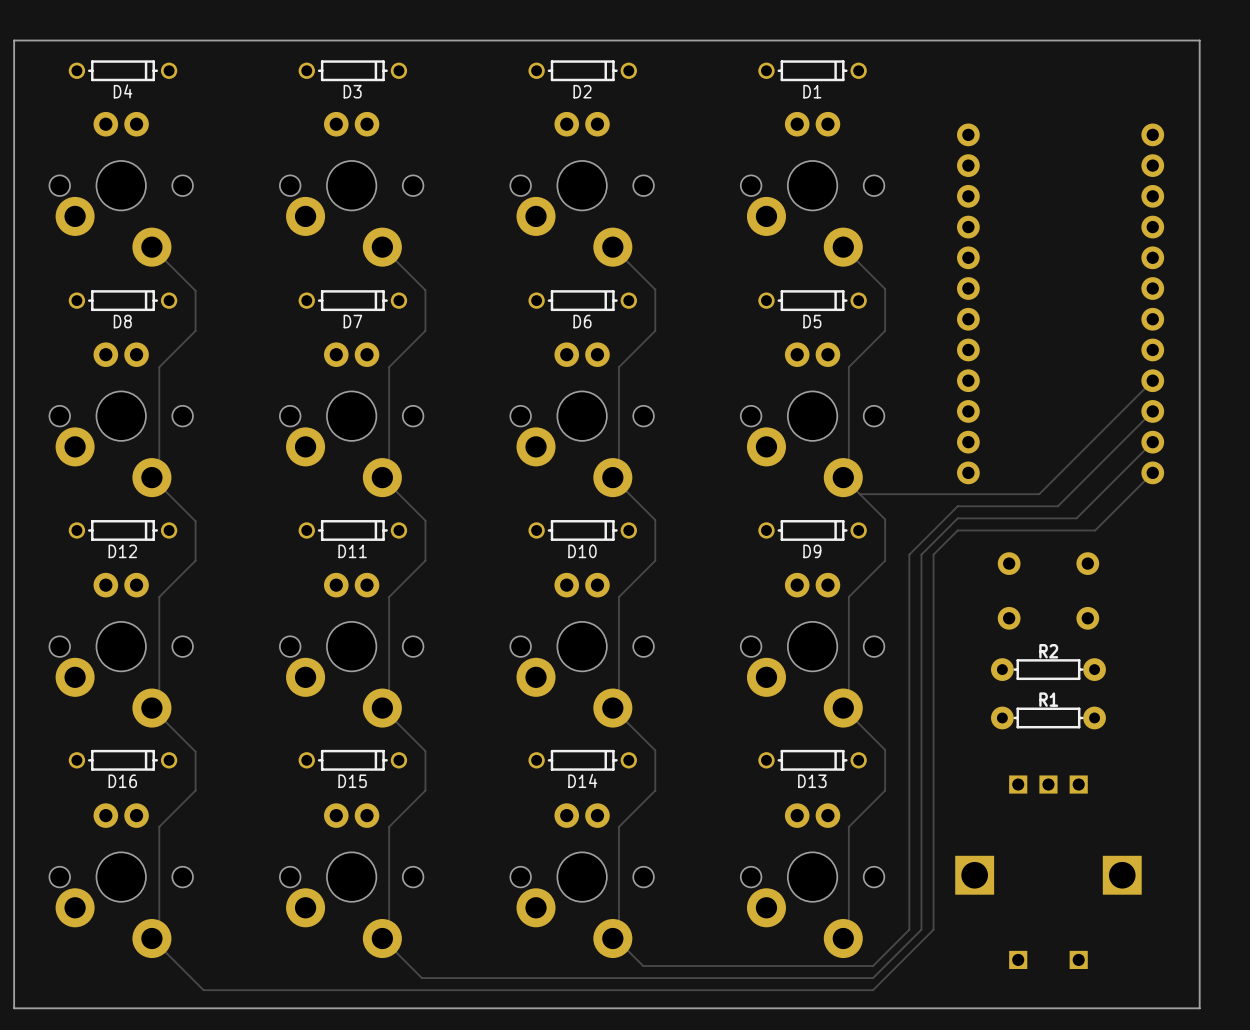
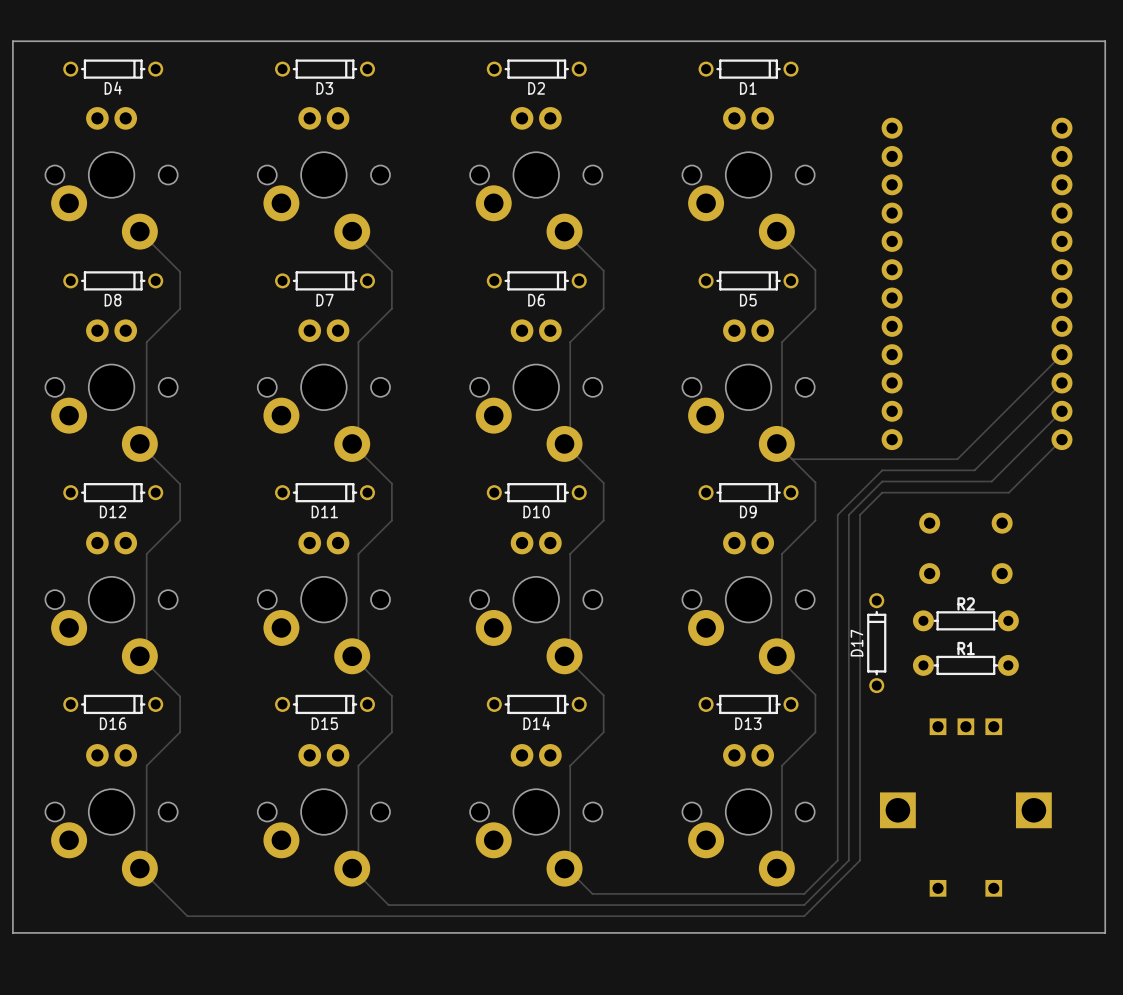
D17: none -> (876, 643)

